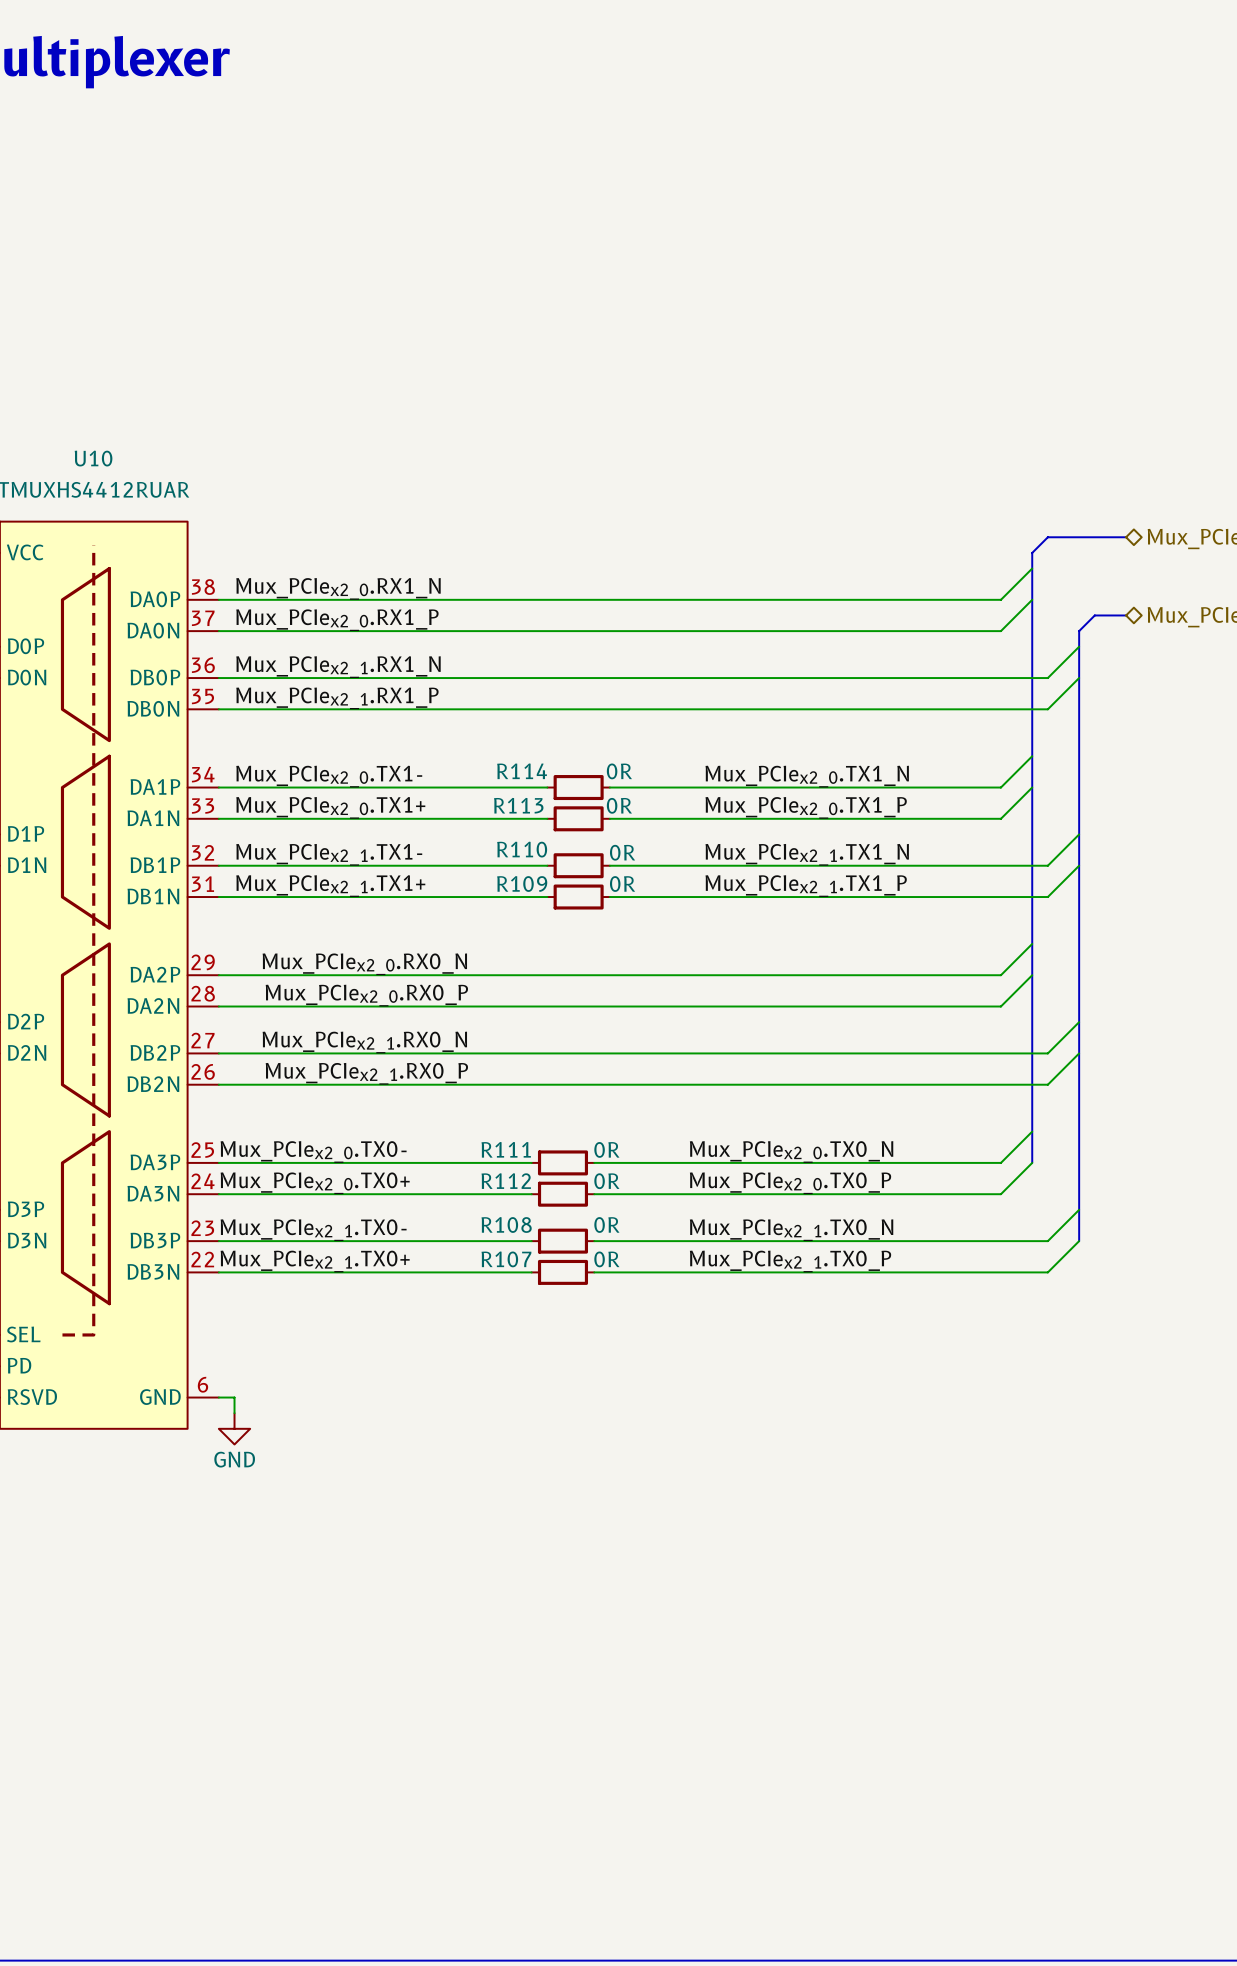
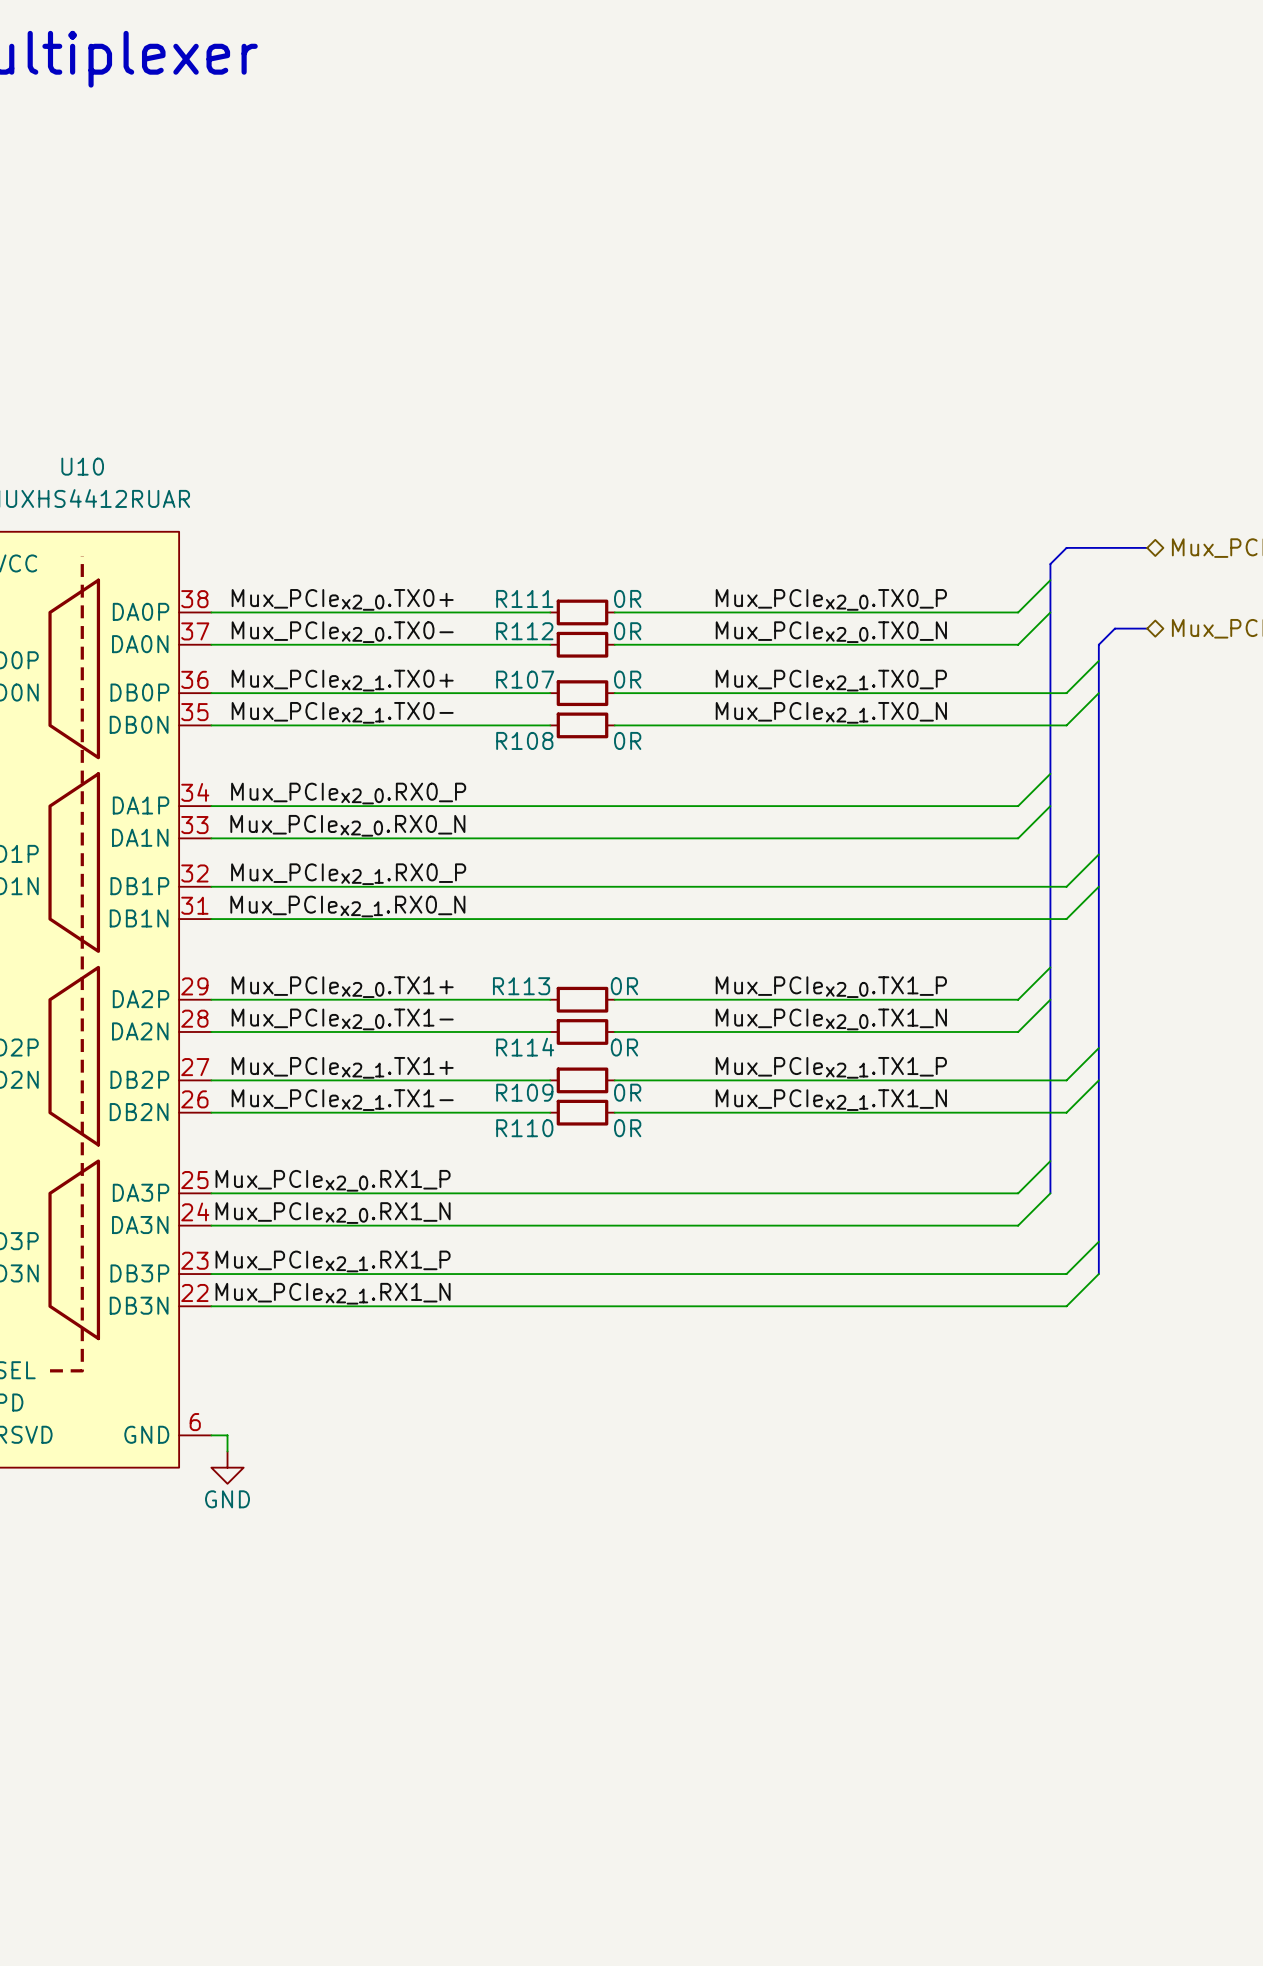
label: Mux_PCIex2_0.RX1_N (338, 588) -> Mux_PCIex2_0.TX0+ (342, 599)
label: none -> Mux_PCIex2_0.TX0_P (831, 599)
wire: (547, 599) (609, 599) -> (550, 806) (614, 806)
label: Mux_PCIex2_0.RX1_P (337, 620) -> Mux_PCIex2_0.TX0- (342, 632)
label: none -> Mux_PCIex2_0.TX0_N (831, 632)
wire: (547, 631) (609, 631) -> none
label: Mux_PCIex2_1.RX1_N (338, 667) -> Mux_PCIex2_1.TX0+ (342, 680)
label: none -> Mux_PCIex2_1.TX0_P (831, 680)
wire: (547, 678) (609, 678) -> none
label: Mux_PCIex2_1.RX1_P (337, 698) -> Mux_PCIex2_1.TX0- (342, 712)
label: none -> Mux_PCIex2_1.TX0_N (831, 712)
wire: (547, 709) (609, 709) -> (550, 919) (614, 919)
R114 name position: R114 (522, 771) -> R114 (525, 1047)
R114 text position: 0R (619, 771) -> 0R (624, 1047)
label position: Mux_PCIex2_0.TX1- (329, 776) -> Mux_PCIex2_0.TX1- (342, 1019)
label position: Mux_PCIex2_0.TX1_N (807, 776) -> Mux_PCIex2_0.TX1_N (831, 1019)
R114 position: (578, 787) -> (582, 1031)
label position: Mux_PCIex2_0.TX1+ (330, 807) -> Mux_PCIex2_0.TX1+ (342, 987)
label position: Mux_PCIex2_0.TX1_P (806, 807) -> Mux_PCIex2_0.TX1_P (831, 987)
R113 position: (578, 818) -> (582, 999)
R110 name position: R110 (522, 849) -> R110 (524, 1128)
R110 text position: 0R (622, 852) -> 0R (627, 1128)
label position: Mux_PCIex2_1.TX1- (329, 854) -> Mux_PCIex2_1.TX1- (342, 1100)
label position: Mux_PCIex2_1.TX1_N (807, 854) -> Mux_PCIex2_1.TX1_N (831, 1100)
R110 position: (578, 865) -> (582, 1112)
R109 name position: R109 (522, 884) -> R109 (524, 1092)
R109 text position: 0R (622, 884) -> 0R (627, 1092)
label position: Mux_PCIex2_1.TX1+ (330, 886) -> Mux_PCIex2_1.TX1+ (342, 1067)
label position: Mux_PCIex2_1.TX1_P (806, 886) -> Mux_PCIex2_1.TX1_P (831, 1067)
R109 position: (578, 897) -> (582, 1080)
label position: Mux_PCIex2_0.RX0_N (364, 964) -> Mux_PCIex2_0.RX0_N (347, 825)
wire: (547, 975) (609, 975) -> (534, 1193) (598, 1193)
label position: Mux_PCIex2_0.RX0_P (366, 995) -> Mux_PCIex2_0.RX0_P (348, 793)
wire: (547, 1006) (609, 1006) -> (550, 838) (614, 838)
label position: Mux_PCIex2_1.RX0_N (364, 1042) -> Mux_PCIex2_1.RX0_N (347, 906)
wire: (547, 1053) (609, 1053) -> (550, 886) (614, 886)
label position: Mux_PCIex2_1.RX0_P (366, 1073) -> Mux_PCIex2_1.RX0_P (348, 874)
wire: (547, 1084) (609, 1084) -> (534, 1306) (598, 1306)
label: Mux_PCIex2_0.TX0- (313, 1152) -> Mux_PCIex2_0.RX1_P (333, 1180)
label: Mux_PCIex2_0.TX0_N (791, 1152) -> none
R111 position: (562, 1162) -> (582, 612)
label: Mux_PCIex2_0.TX0+ (315, 1183) -> Mux_PCIex2_0.RX1_N (333, 1213)
label: Mux_PCIex2_0.TX0_P (790, 1183) -> none
wire: none -> (534, 1225) (598, 1225)
R112 position: (562, 1194) -> (582, 644)
R108 name position: R108 (506, 1224) -> R108 (524, 740)
R108 text position: 0R (606, 1225) -> 0R (627, 740)
label: Mux_PCIex2_1.TX0- (313, 1230) -> Mux_PCIex2_1.RX1_P (333, 1261)
label: Mux_PCIex2_1.TX0_N (791, 1230) -> none
wire: none -> (534, 1274) (598, 1274)
R108 position: (562, 1241) -> (582, 725)
label: Mux_PCIex2_1.TX0+ (315, 1261) -> Mux_PCIex2_1.RX1_N (333, 1293)
label: Mux_PCIex2_1.TX0_P (790, 1261) -> none
R107 position: (562, 1272) -> (582, 693)

